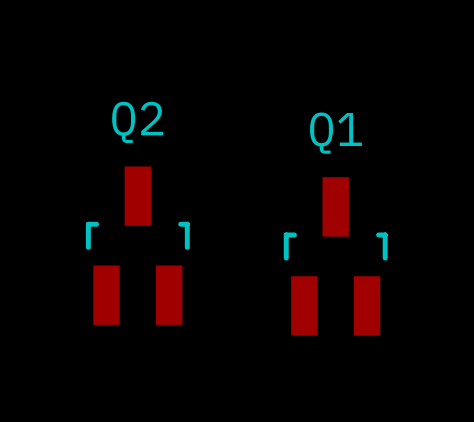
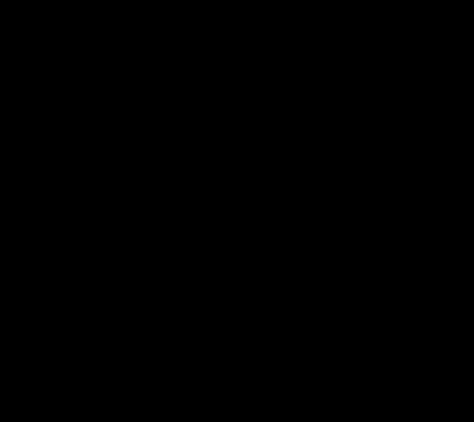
Q2: (137, 245) -> none
Q1: (335, 256) -> none

